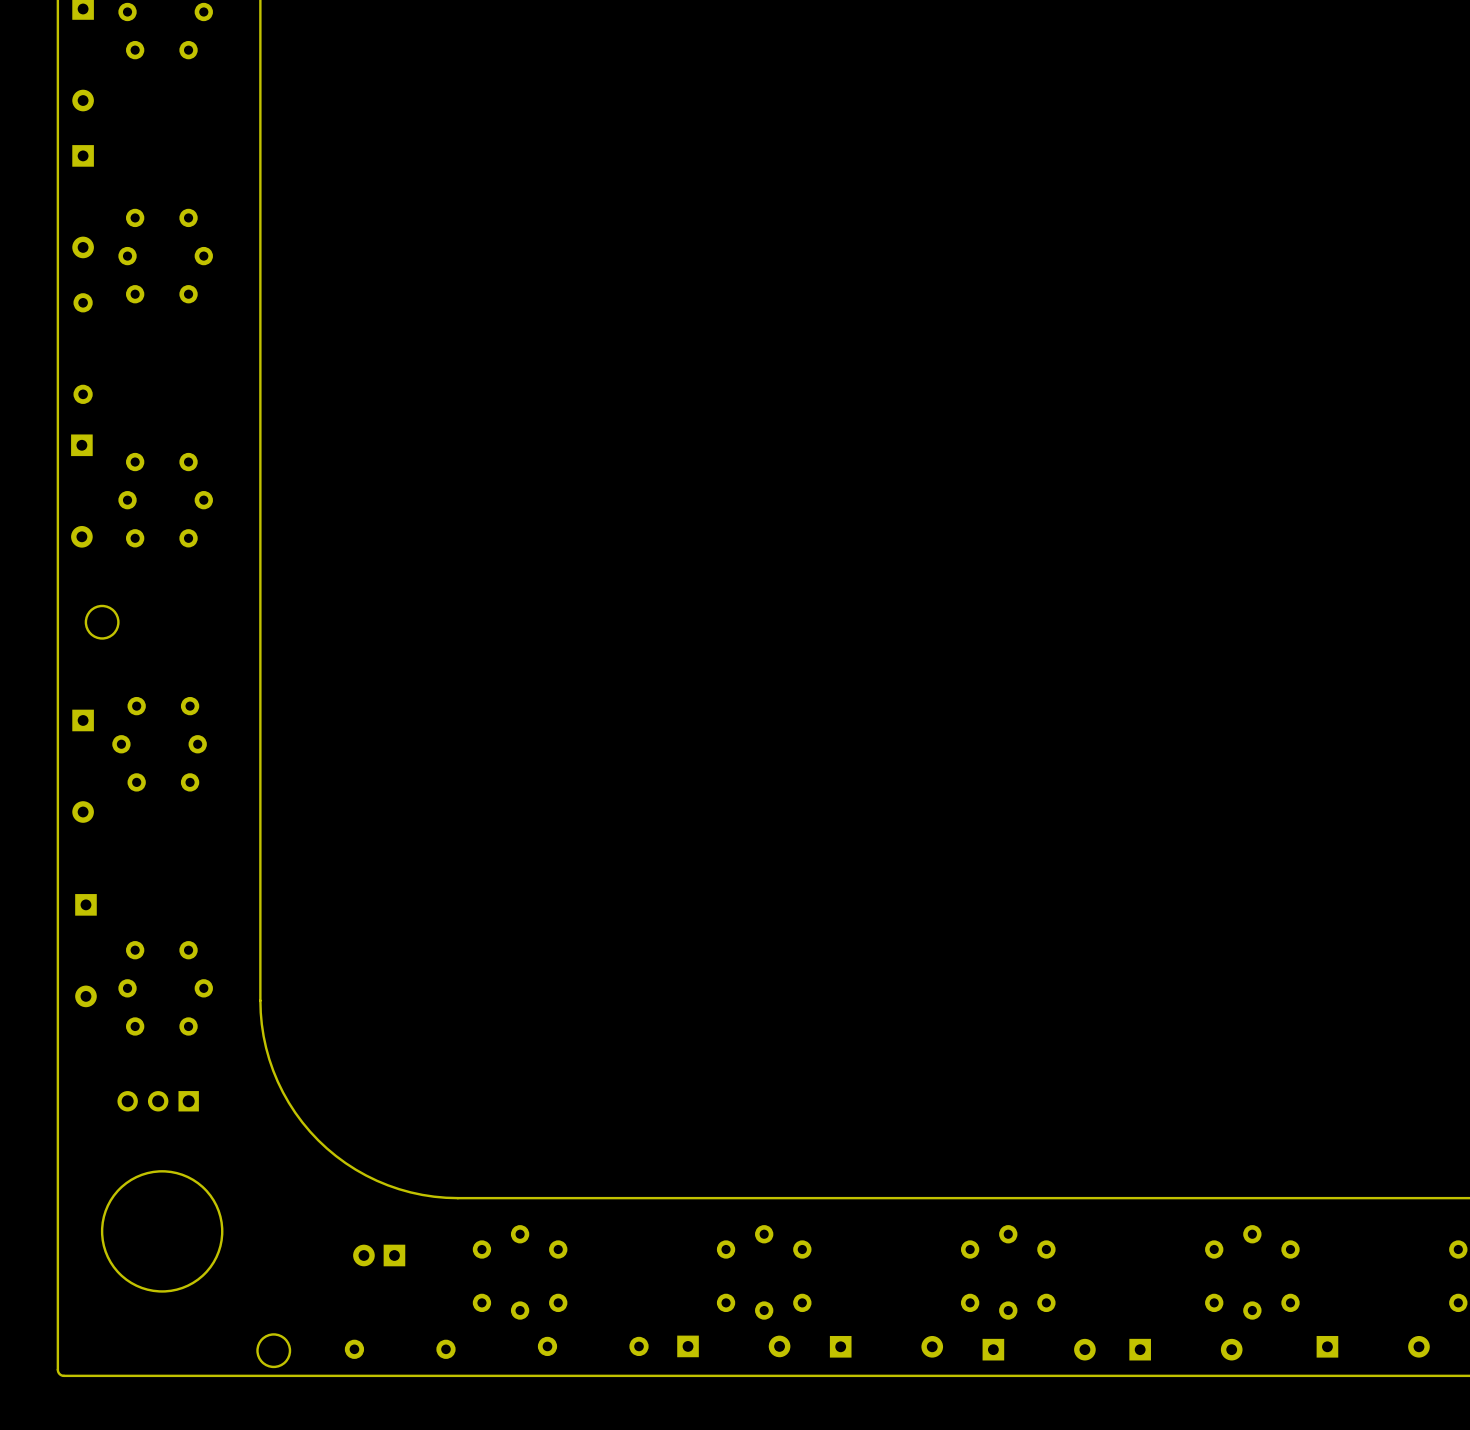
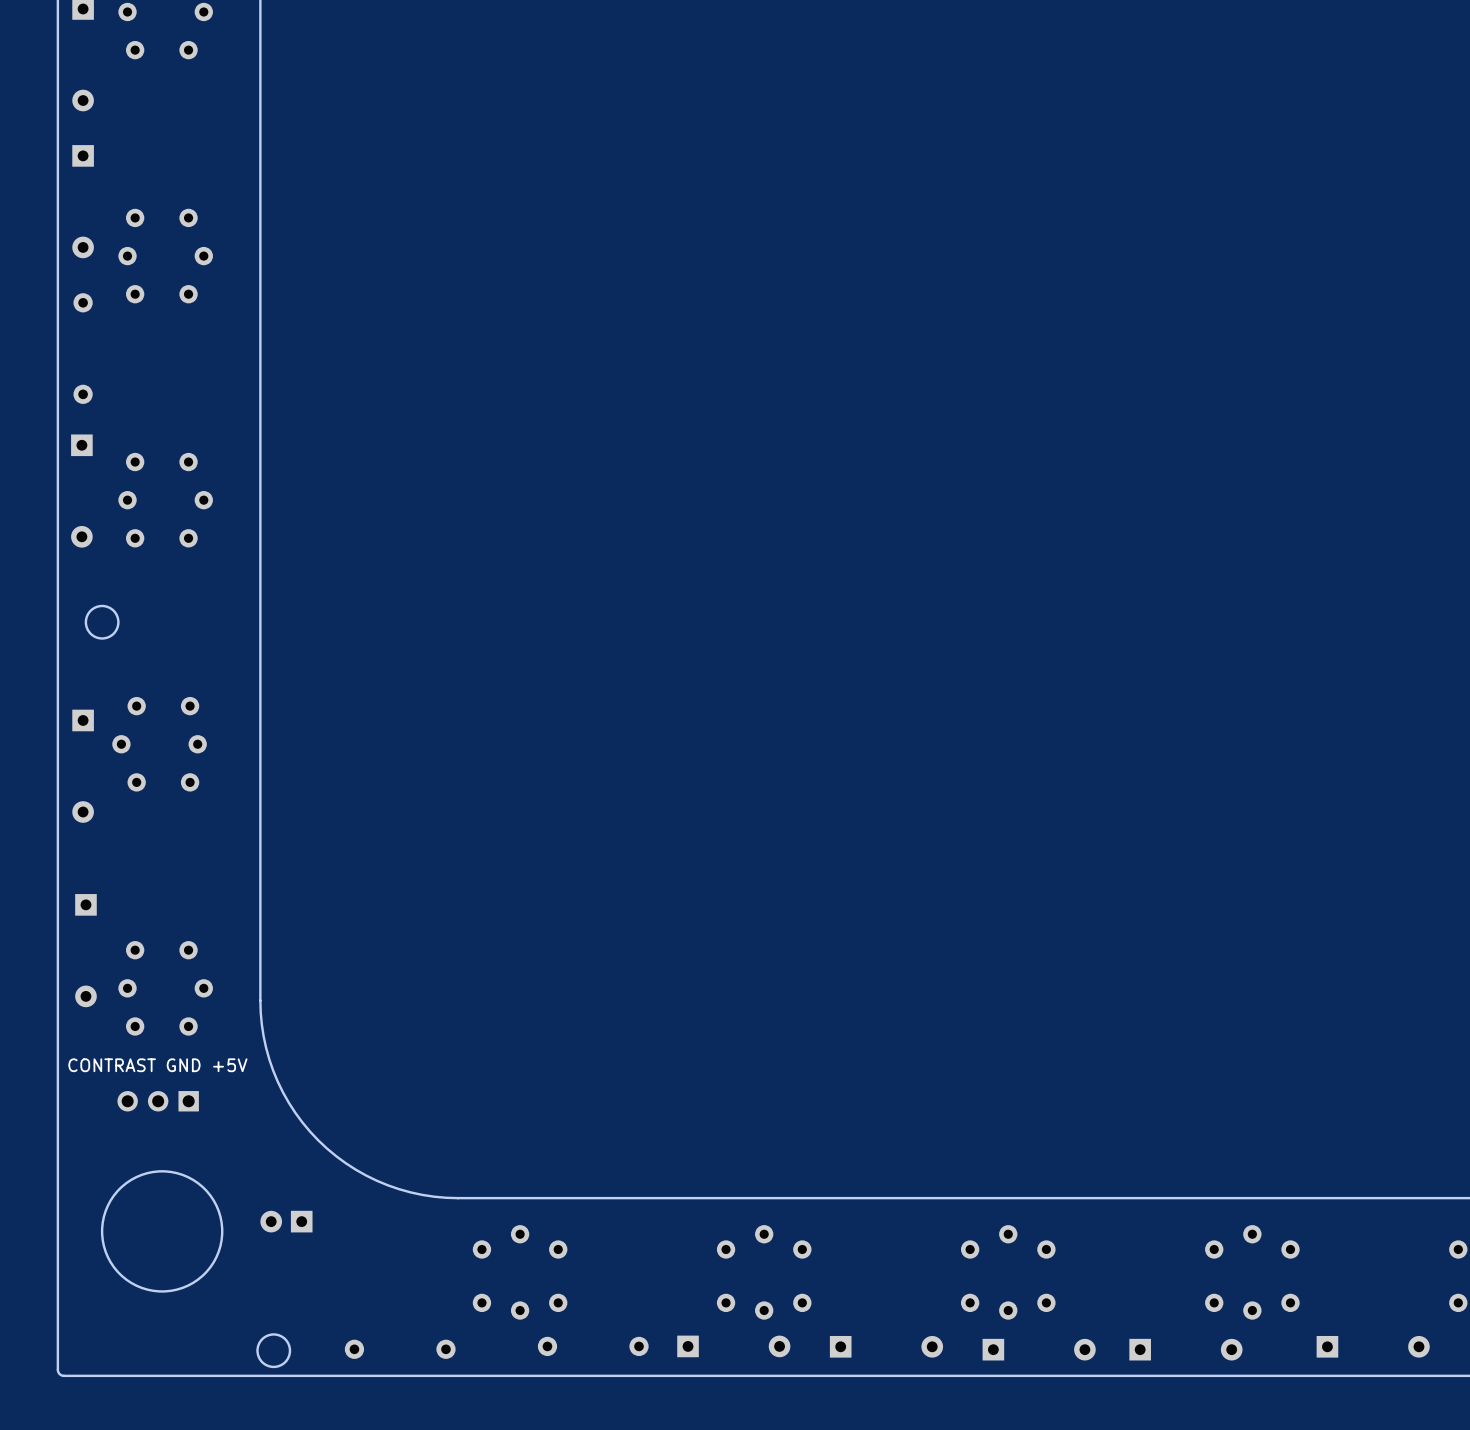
text: none -> CONTRAST GND +5V (157, 1065)
part position: (379, 1255) -> (286, 1221)

